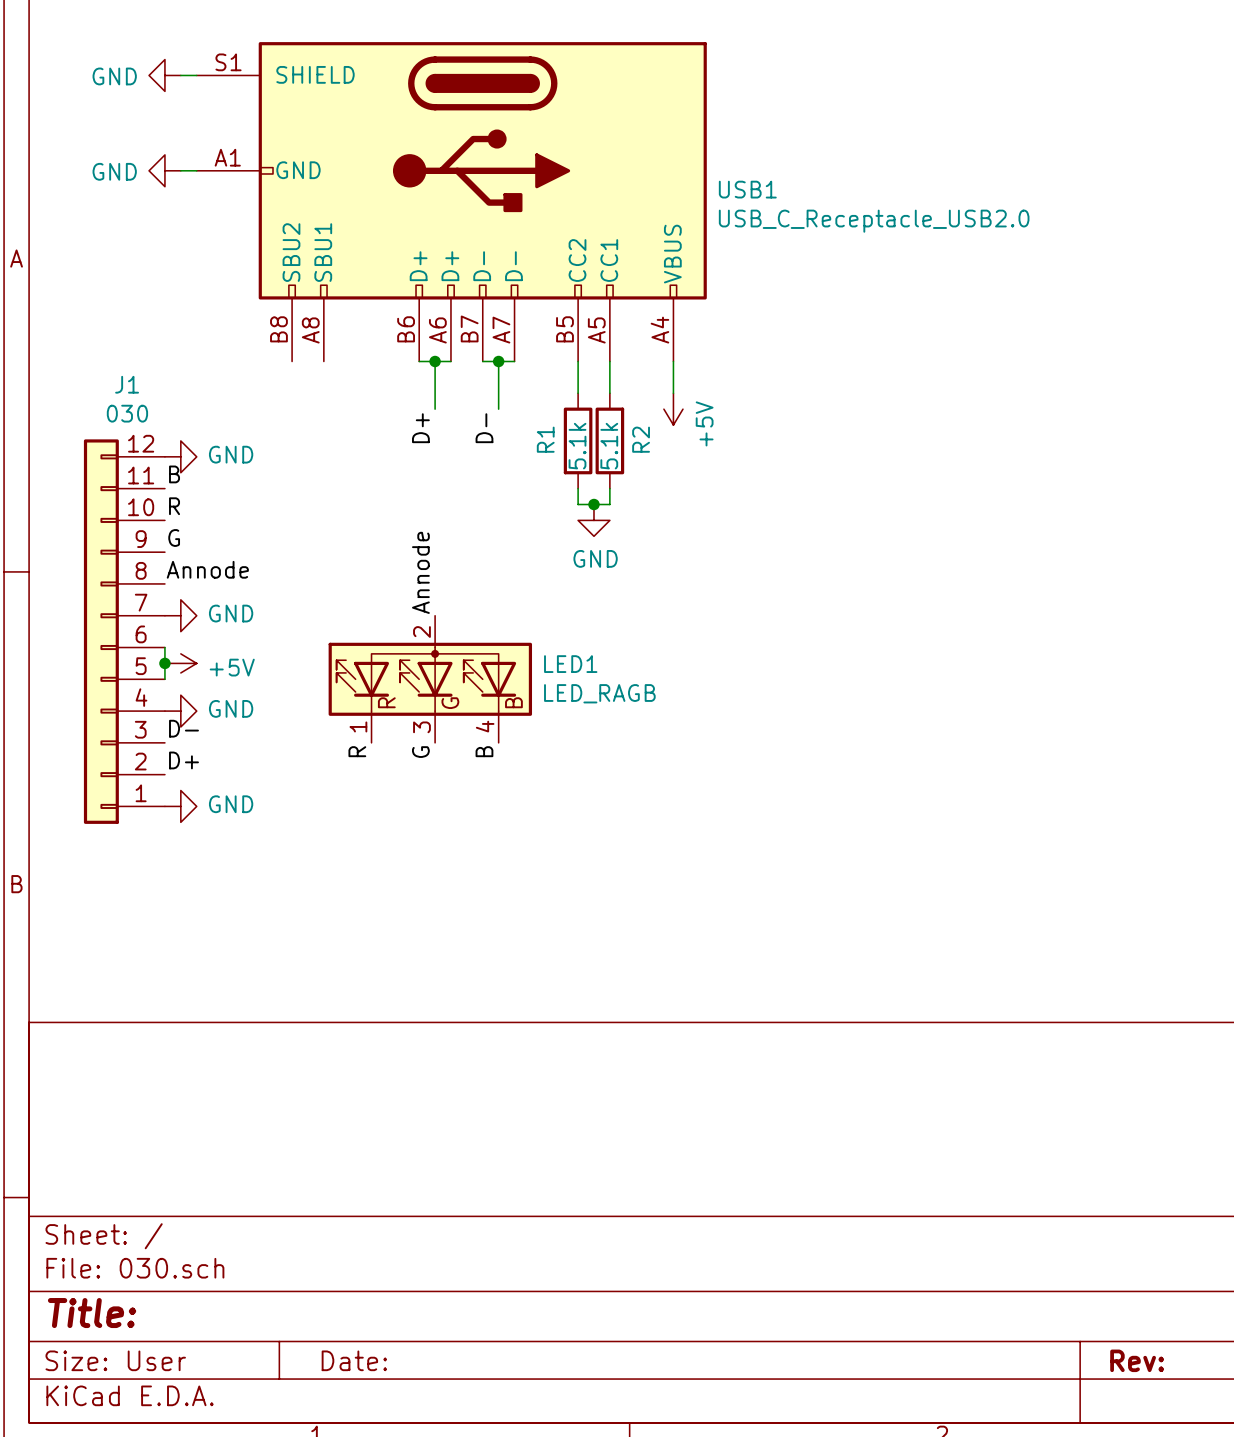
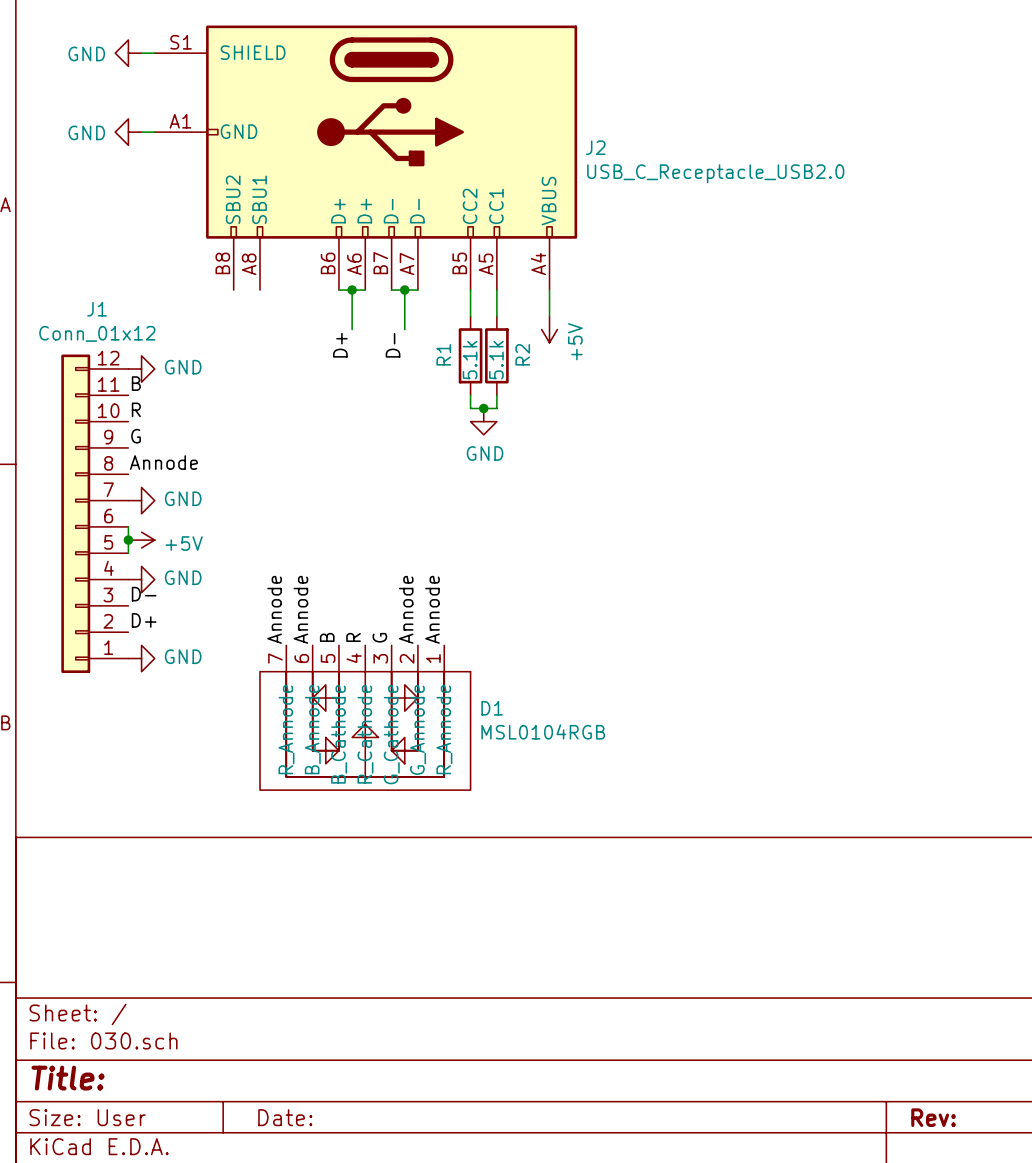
USB1 name: USB1 (747, 189) -> J2 (595, 147)
J1 value: 030 (127, 413) -> Conn_01x12 (97, 333)
label: Annode (420, 572) -> none
LED1: LED_RAGB (430, 679) -> none
label: none -> Annode (274, 609)
label: none -> Annode (300, 609)
label: none -> Annode (406, 609)
label: none -> Annode (432, 609)
label position: R (357, 751) -> R (353, 637)
label position: B (484, 751) -> B (327, 637)
label position: G (420, 752) -> G (379, 637)
D1: none -> MSL0104RGB (365, 717)

